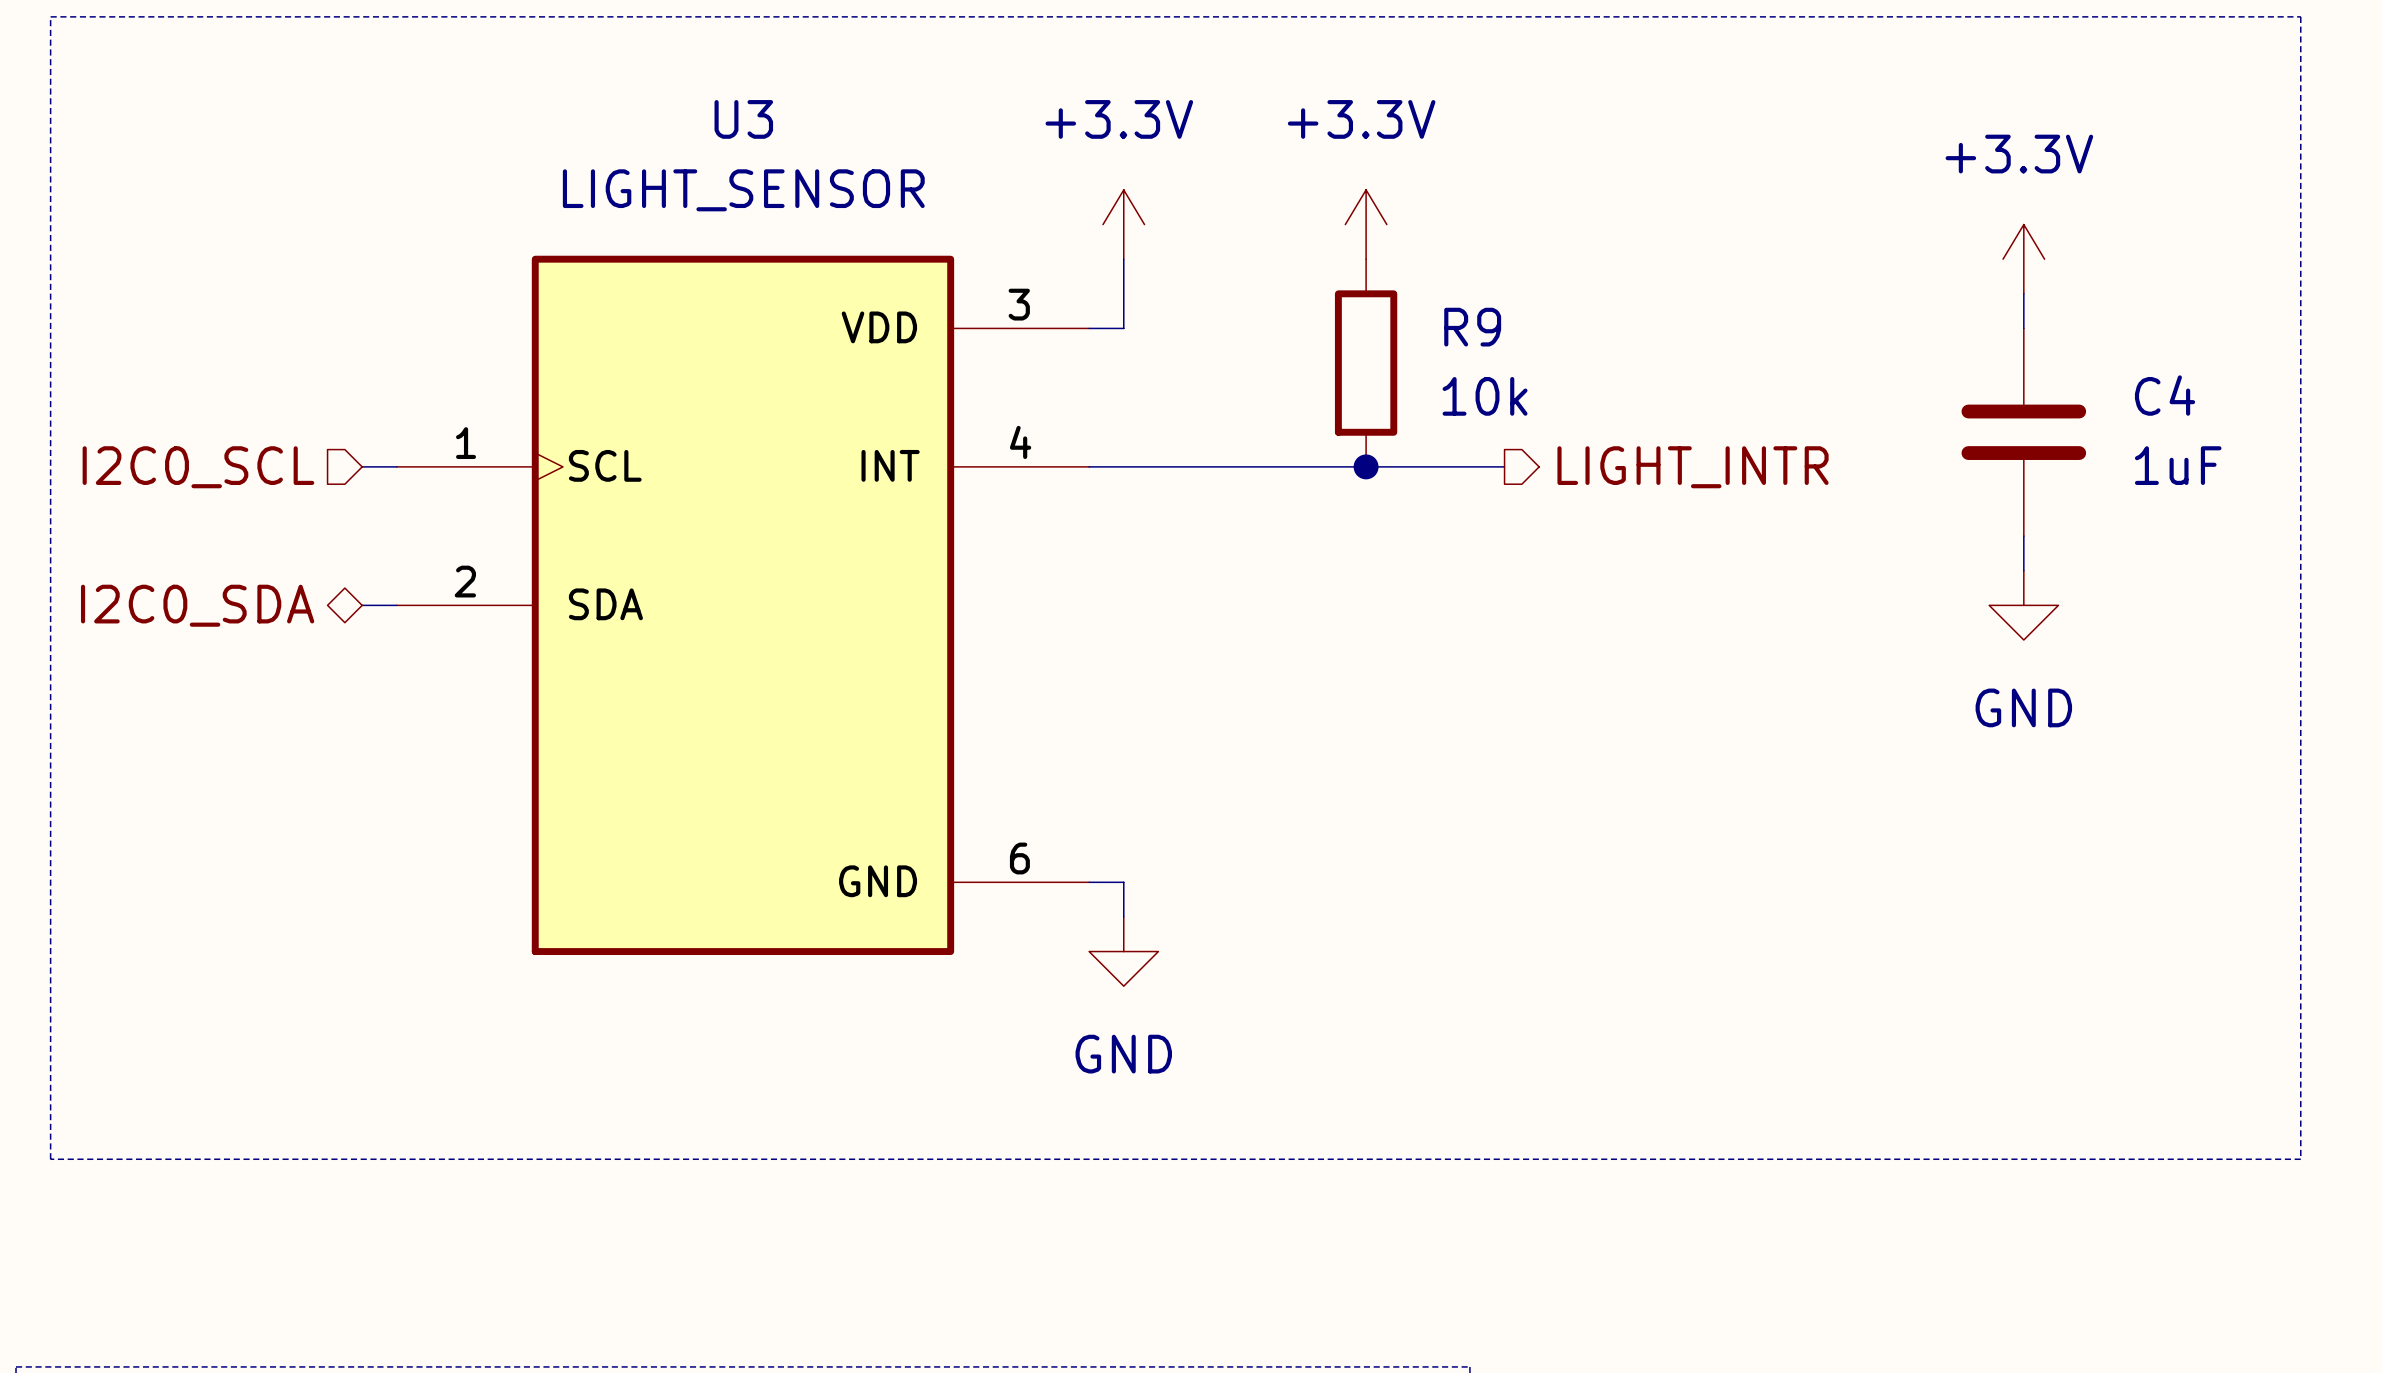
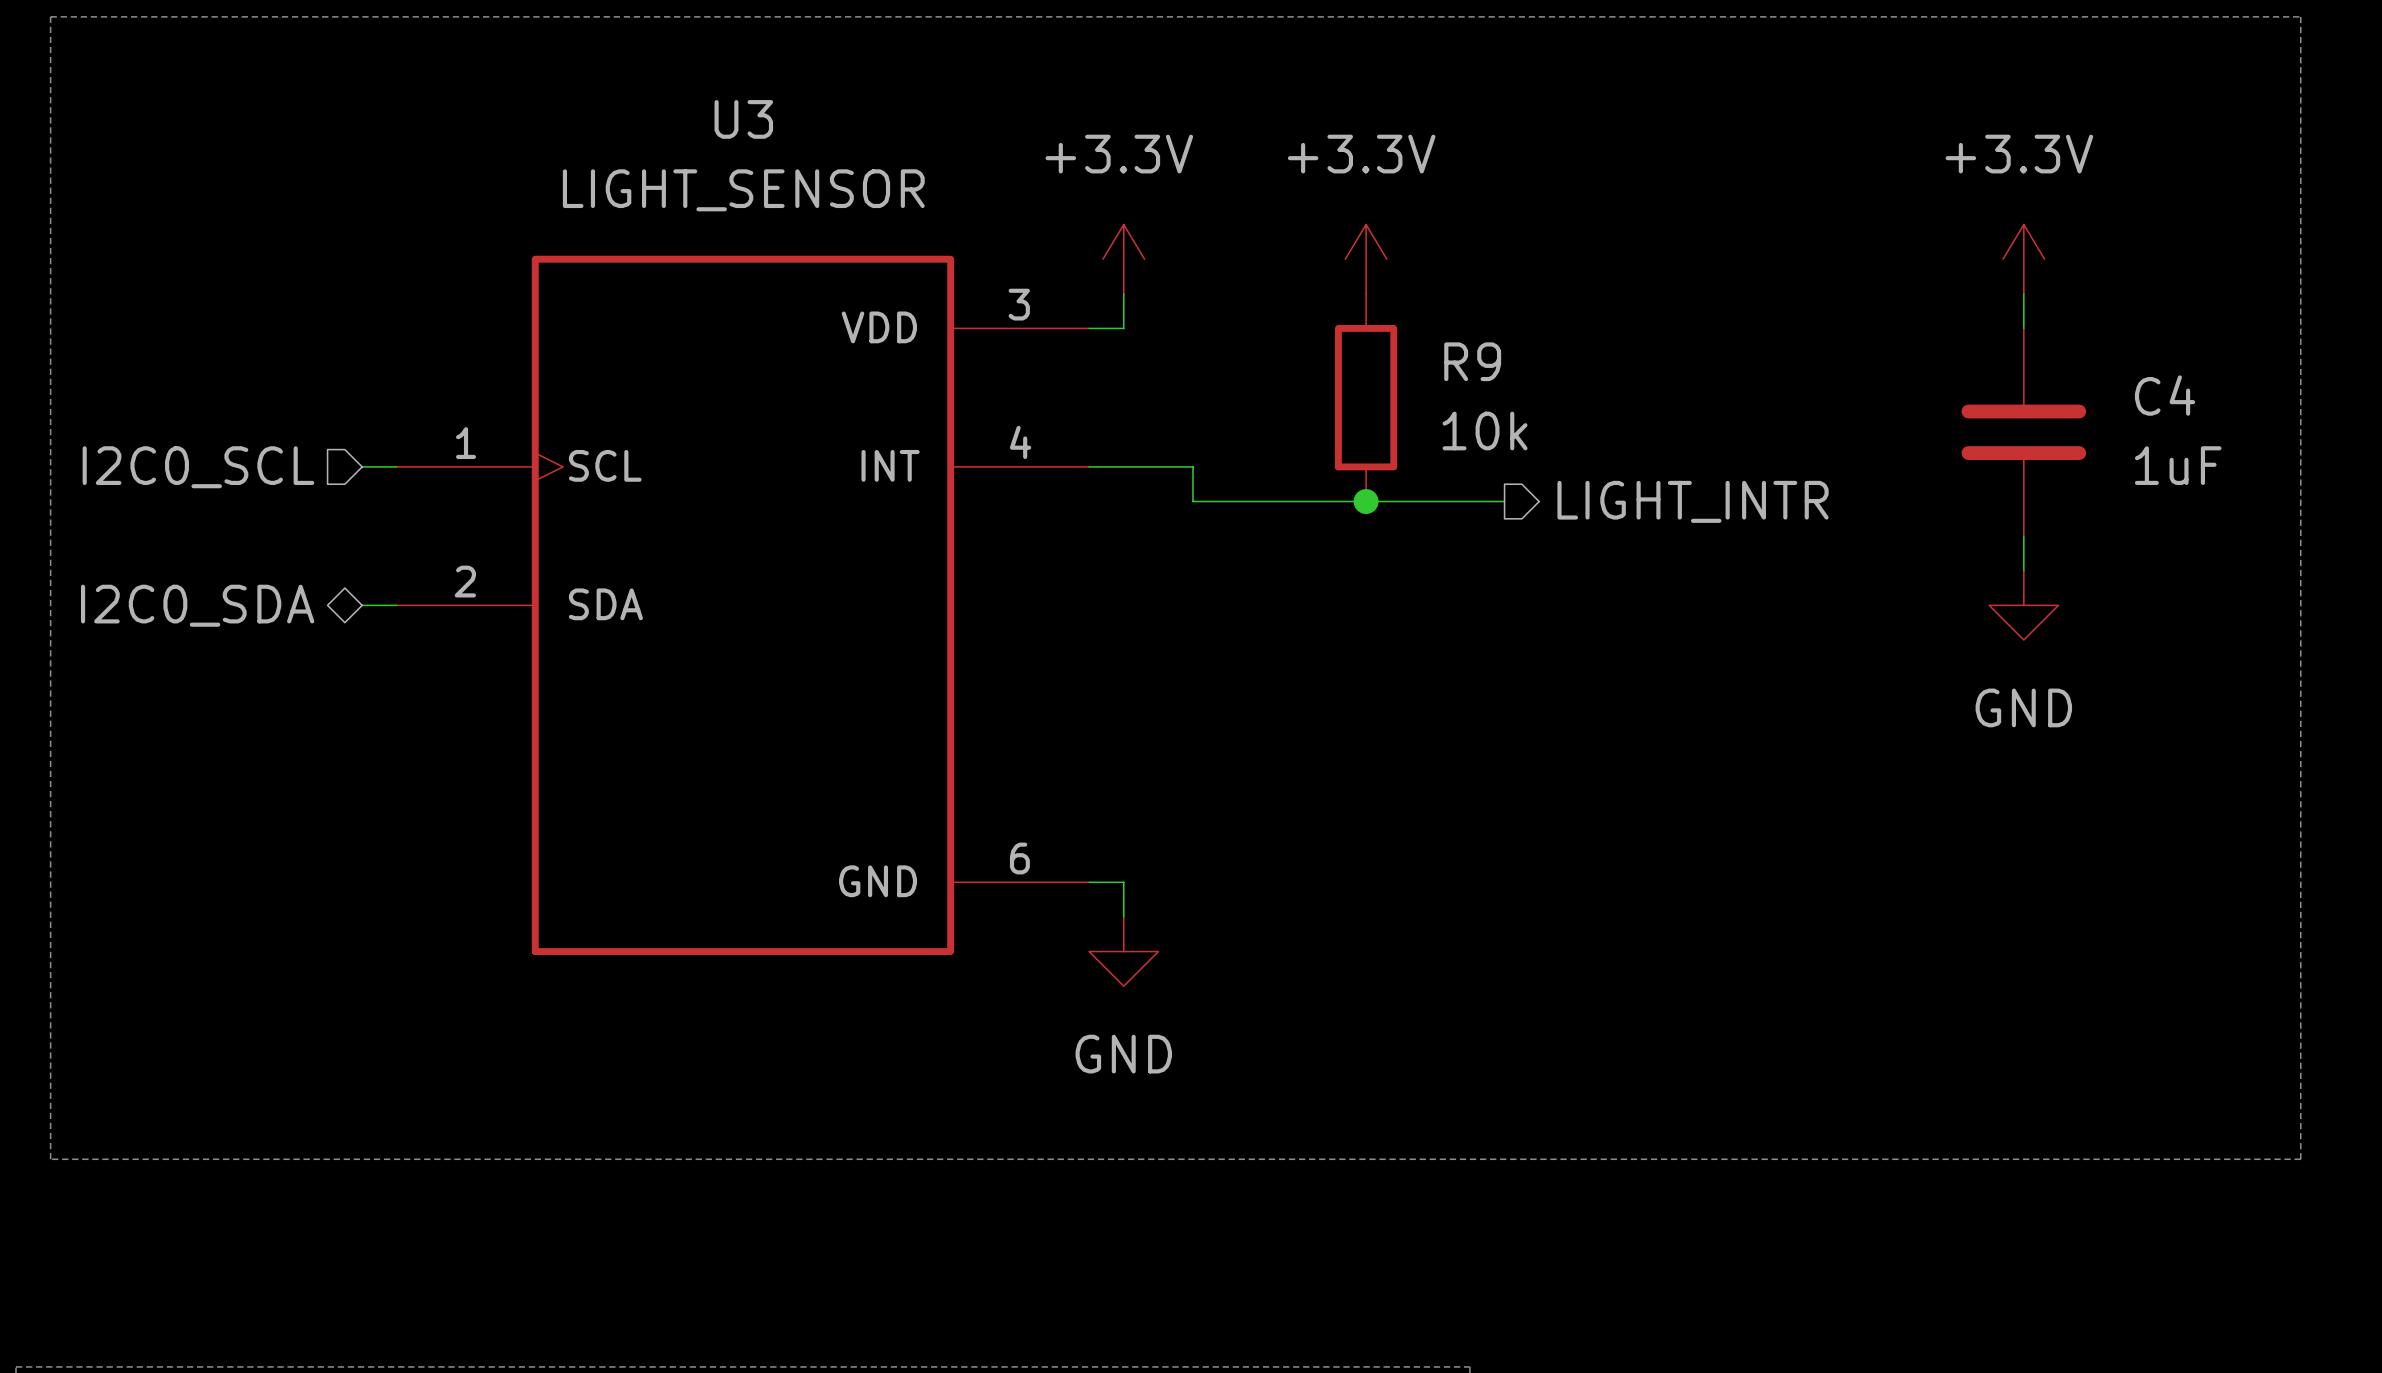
power symbol position: +3.3V (1123, 224) -> +3.3V (1123, 259)
power symbol position: +3.3V (1366, 224) -> +3.3V (1366, 259)
R9 position: (1366, 363) -> (1366, 397)
wire: (1193, 466) (1504, 466) -> (1193, 466) (1193, 501) (1504, 501)
junction position: (1366, 466) -> (1366, 501)
hierarchical label position: LIGHT_INTR (1693, 467) -> LIGHT_INTR (1693, 501)

